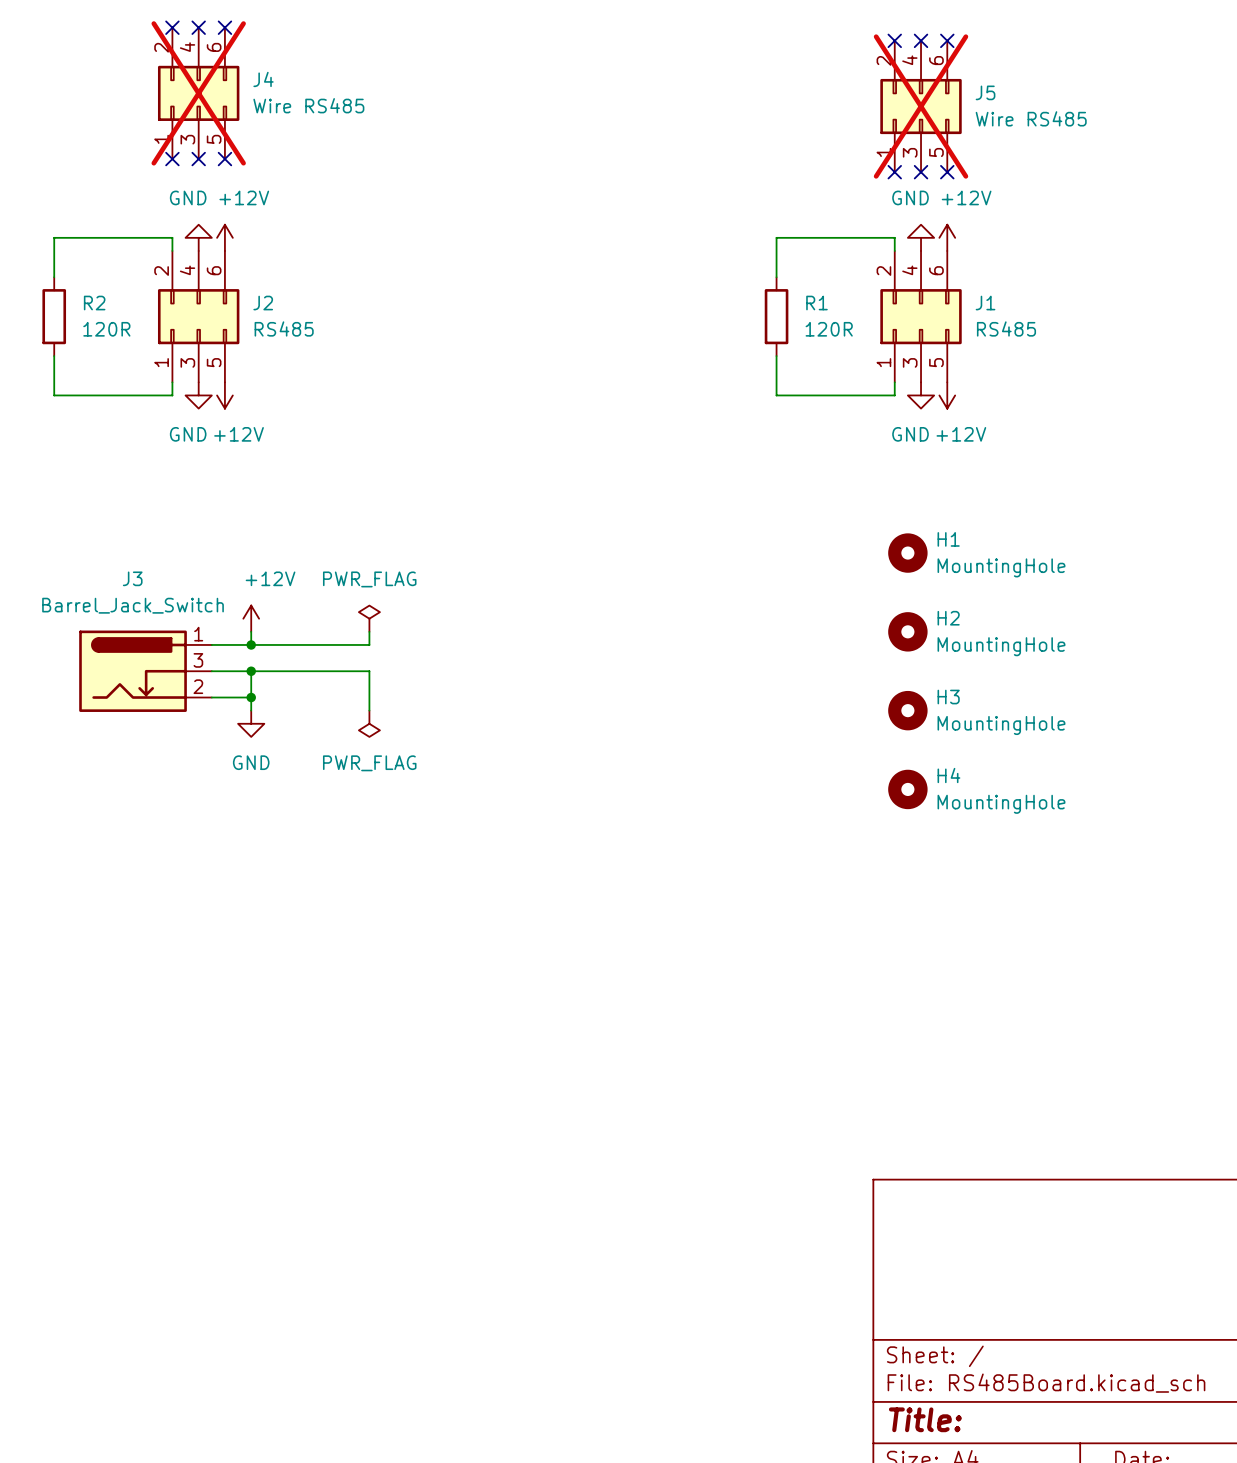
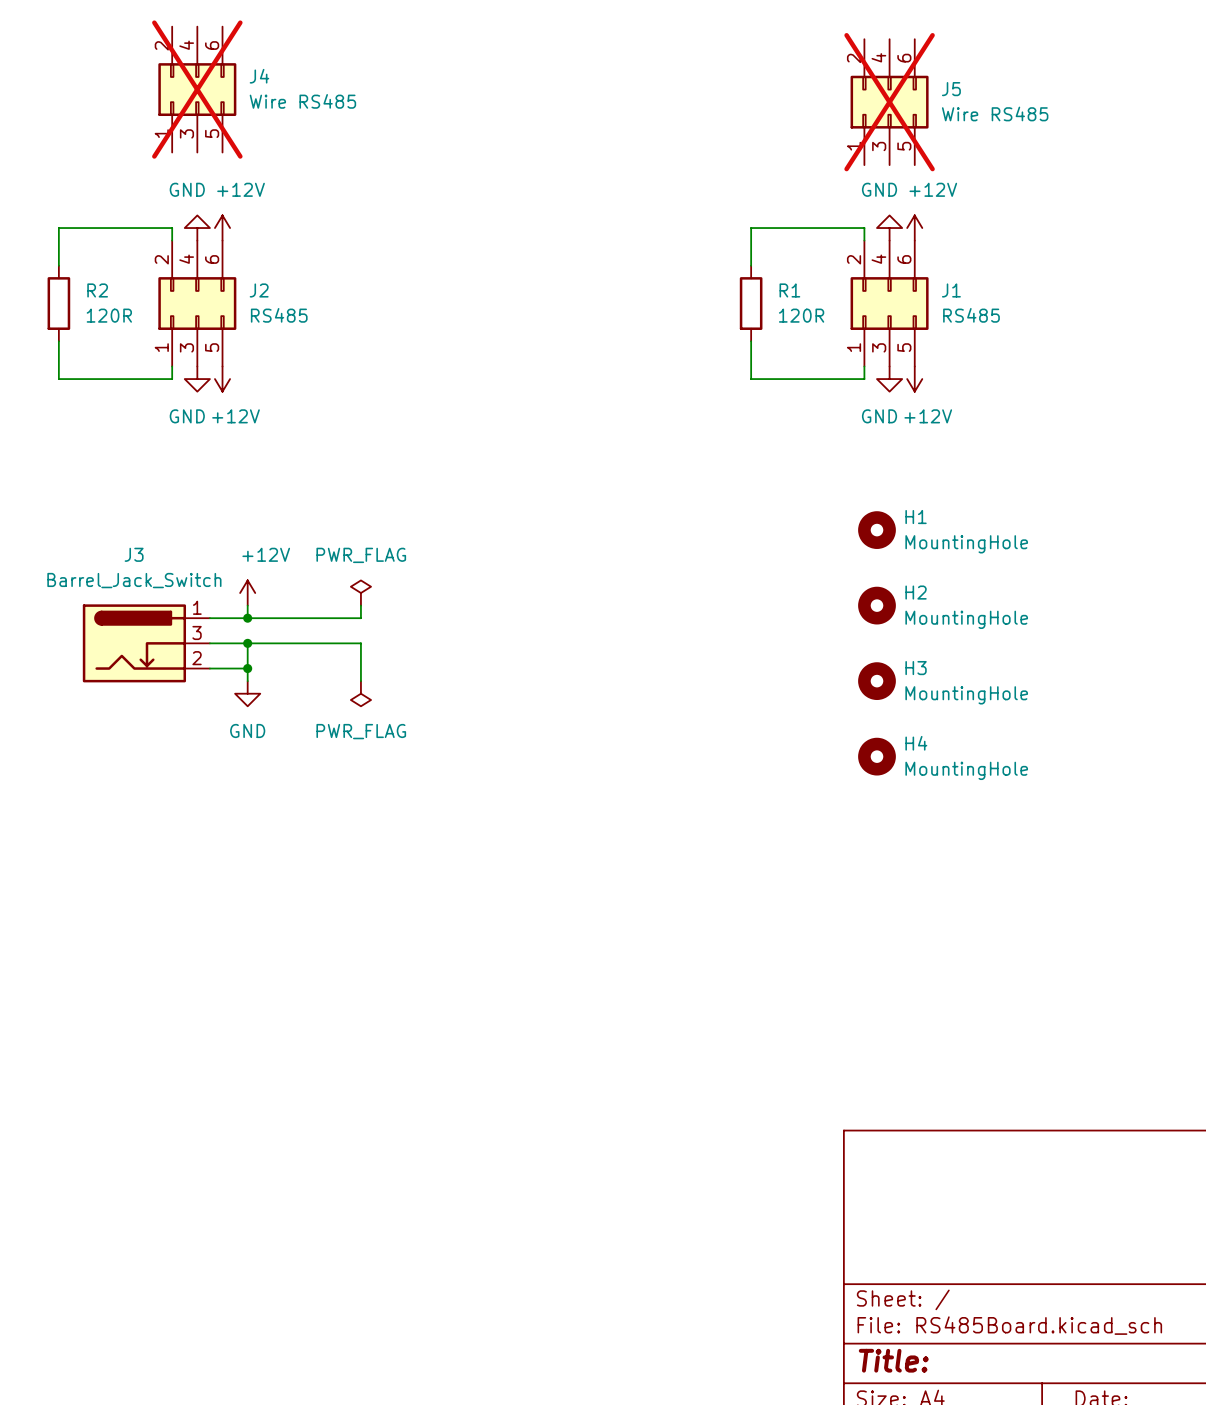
no-connect mark: (172, 27) -> none
no-connect mark: (198, 27) -> none
no-connect mark: (224, 27) -> none
no-connect mark: (894, 40) -> none
no-connect mark: (921, 40) -> none
no-connect mark: (947, 40) -> none
no-connect mark: (172, 159) -> none
no-connect mark: (198, 159) -> none
no-connect mark: (224, 159) -> none
no-connect mark: (894, 172) -> none
no-connect mark: (921, 172) -> none
no-connect mark: (947, 172) -> none

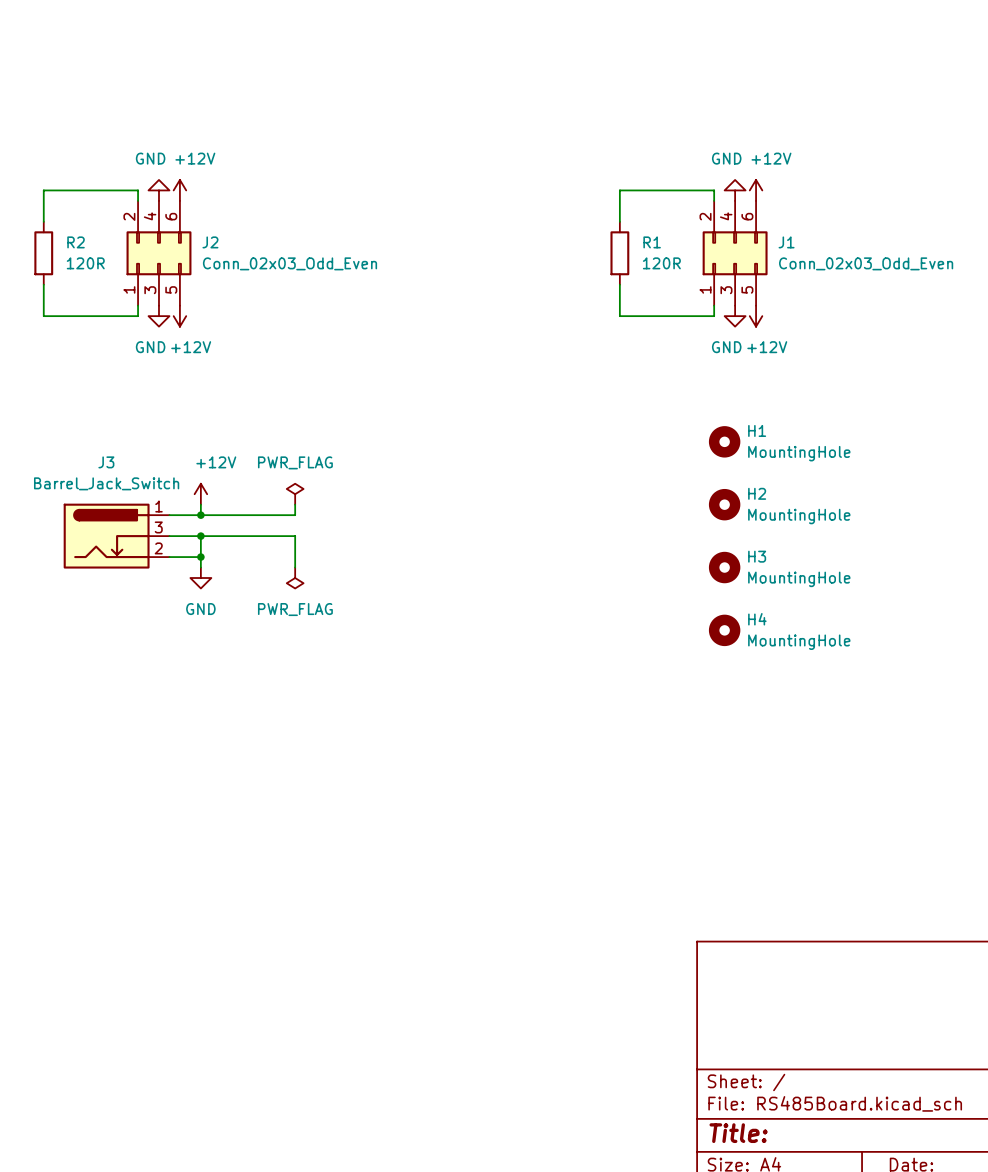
J4: Wire RS485 (197, 89) -> none
J5: Wire RS485 (889, 102) -> none
J2 value: RS485 (279, 315) -> Conn_02x03_Odd_Even (290, 263)
J1 value: RS485 (971, 315) -> Conn_02x03_Odd_Even (866, 263)

